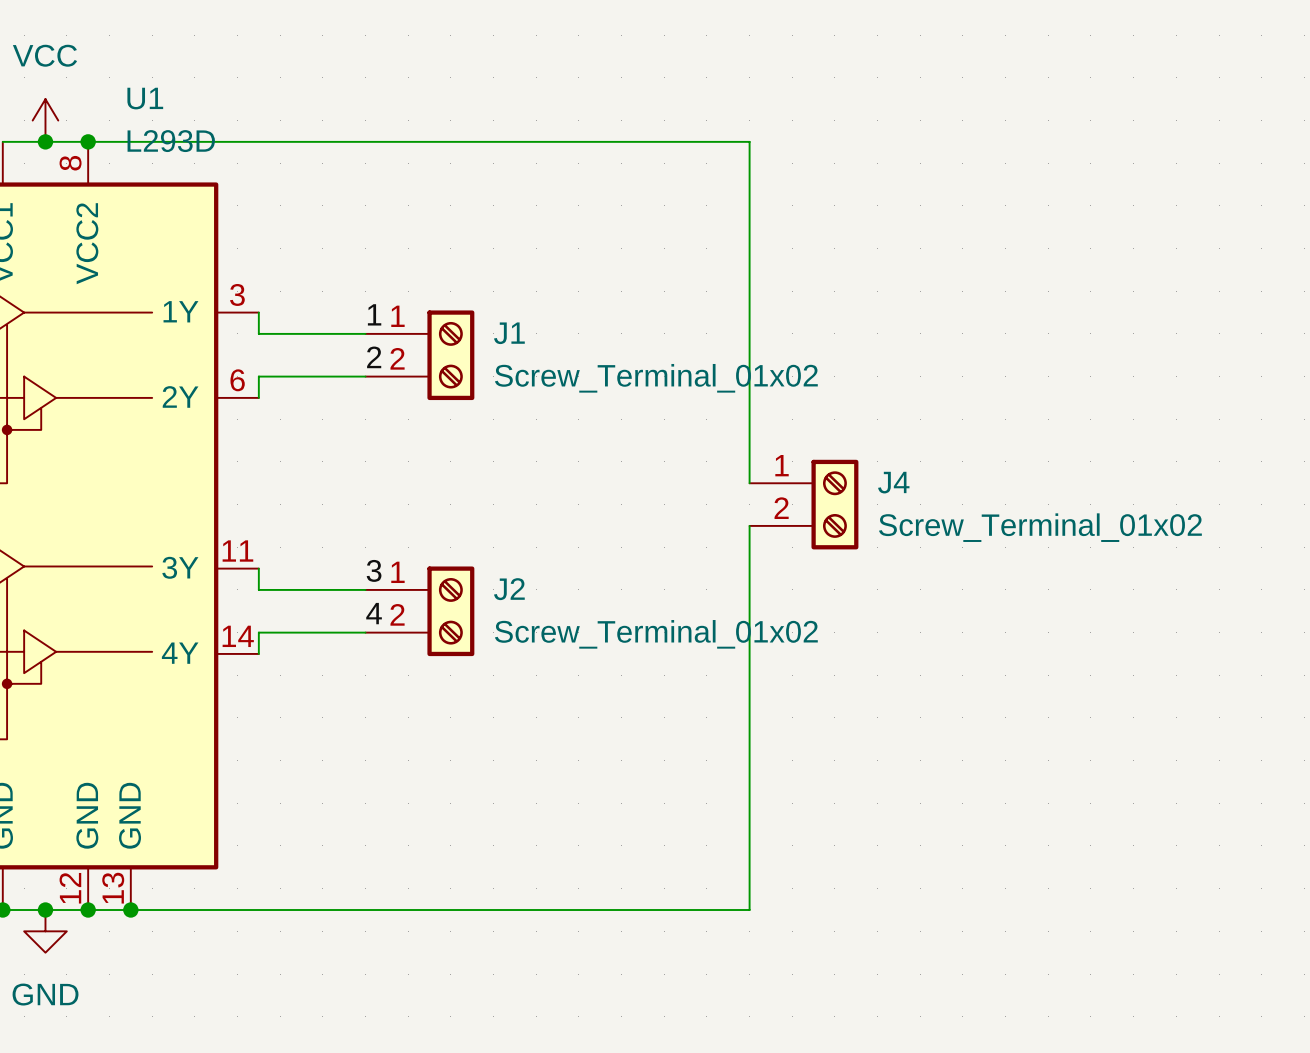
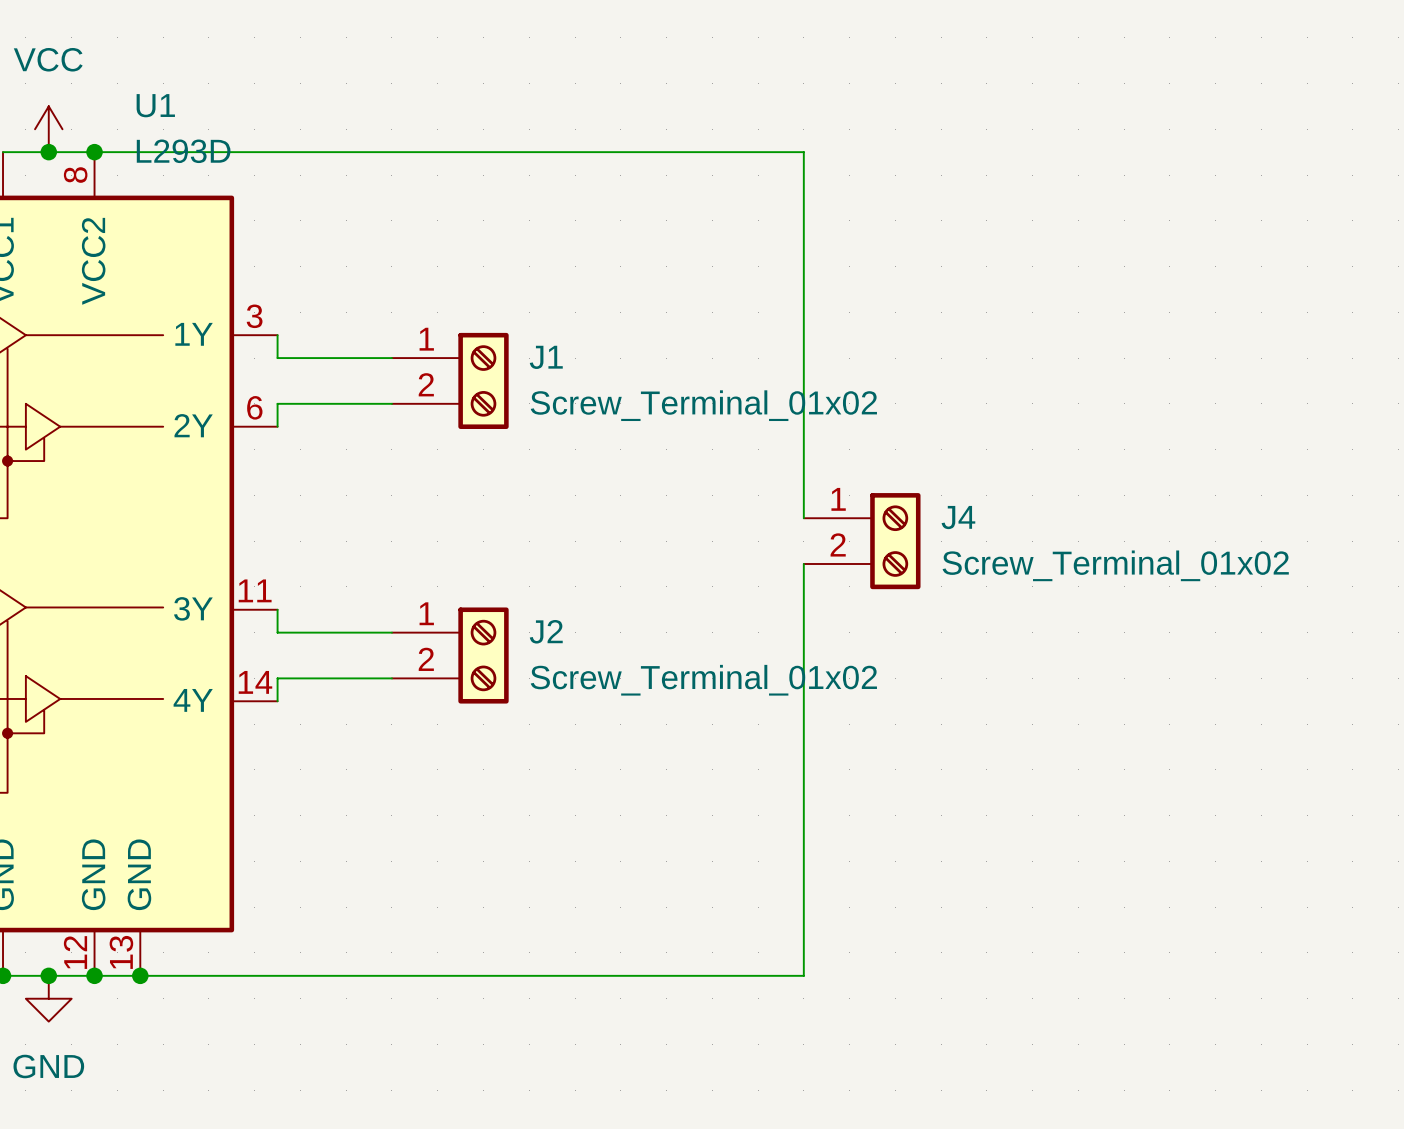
label: 1 (374, 314) -> none
label: 2 (374, 357) -> none
label: 3 (374, 570) -> none
label: 4 (374, 613) -> none

